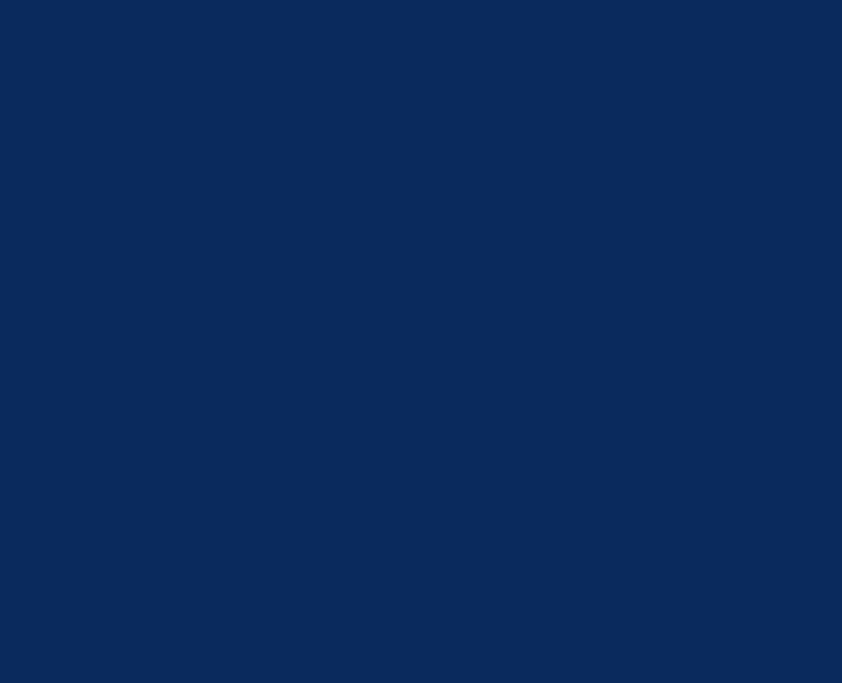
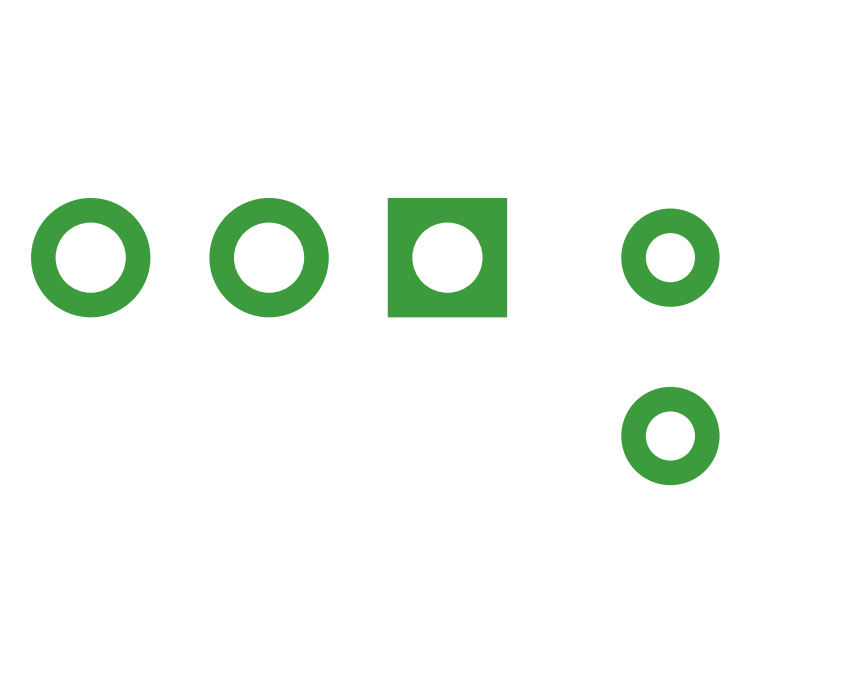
part: none -> (269, 257)
part: none -> (670, 346)

